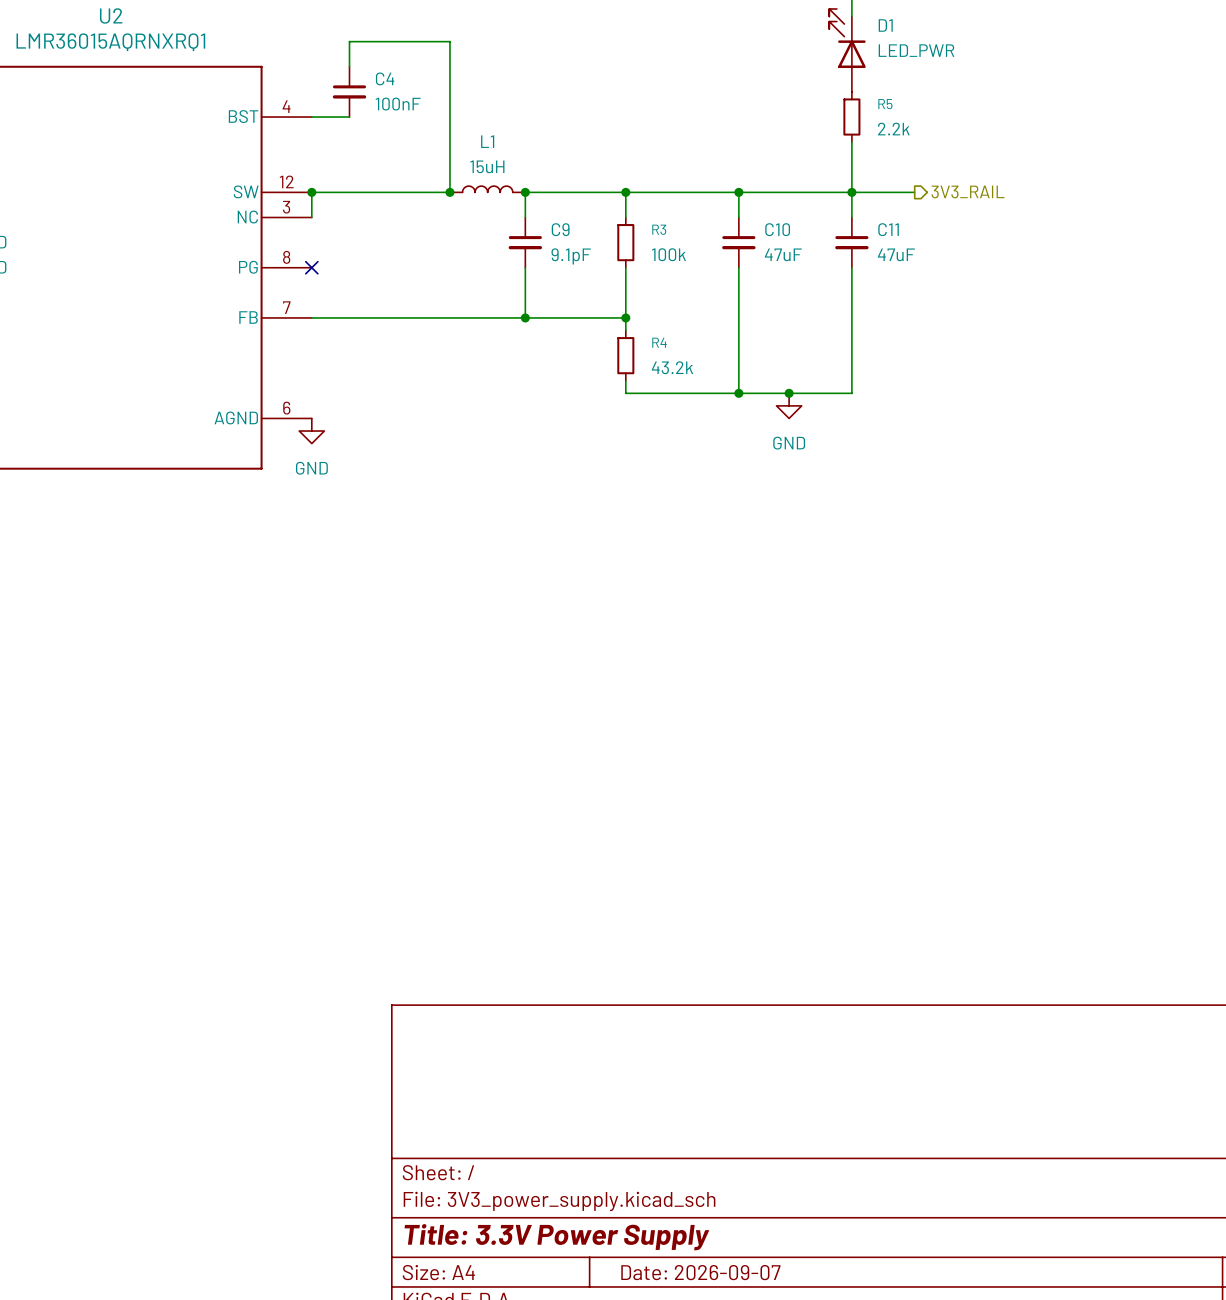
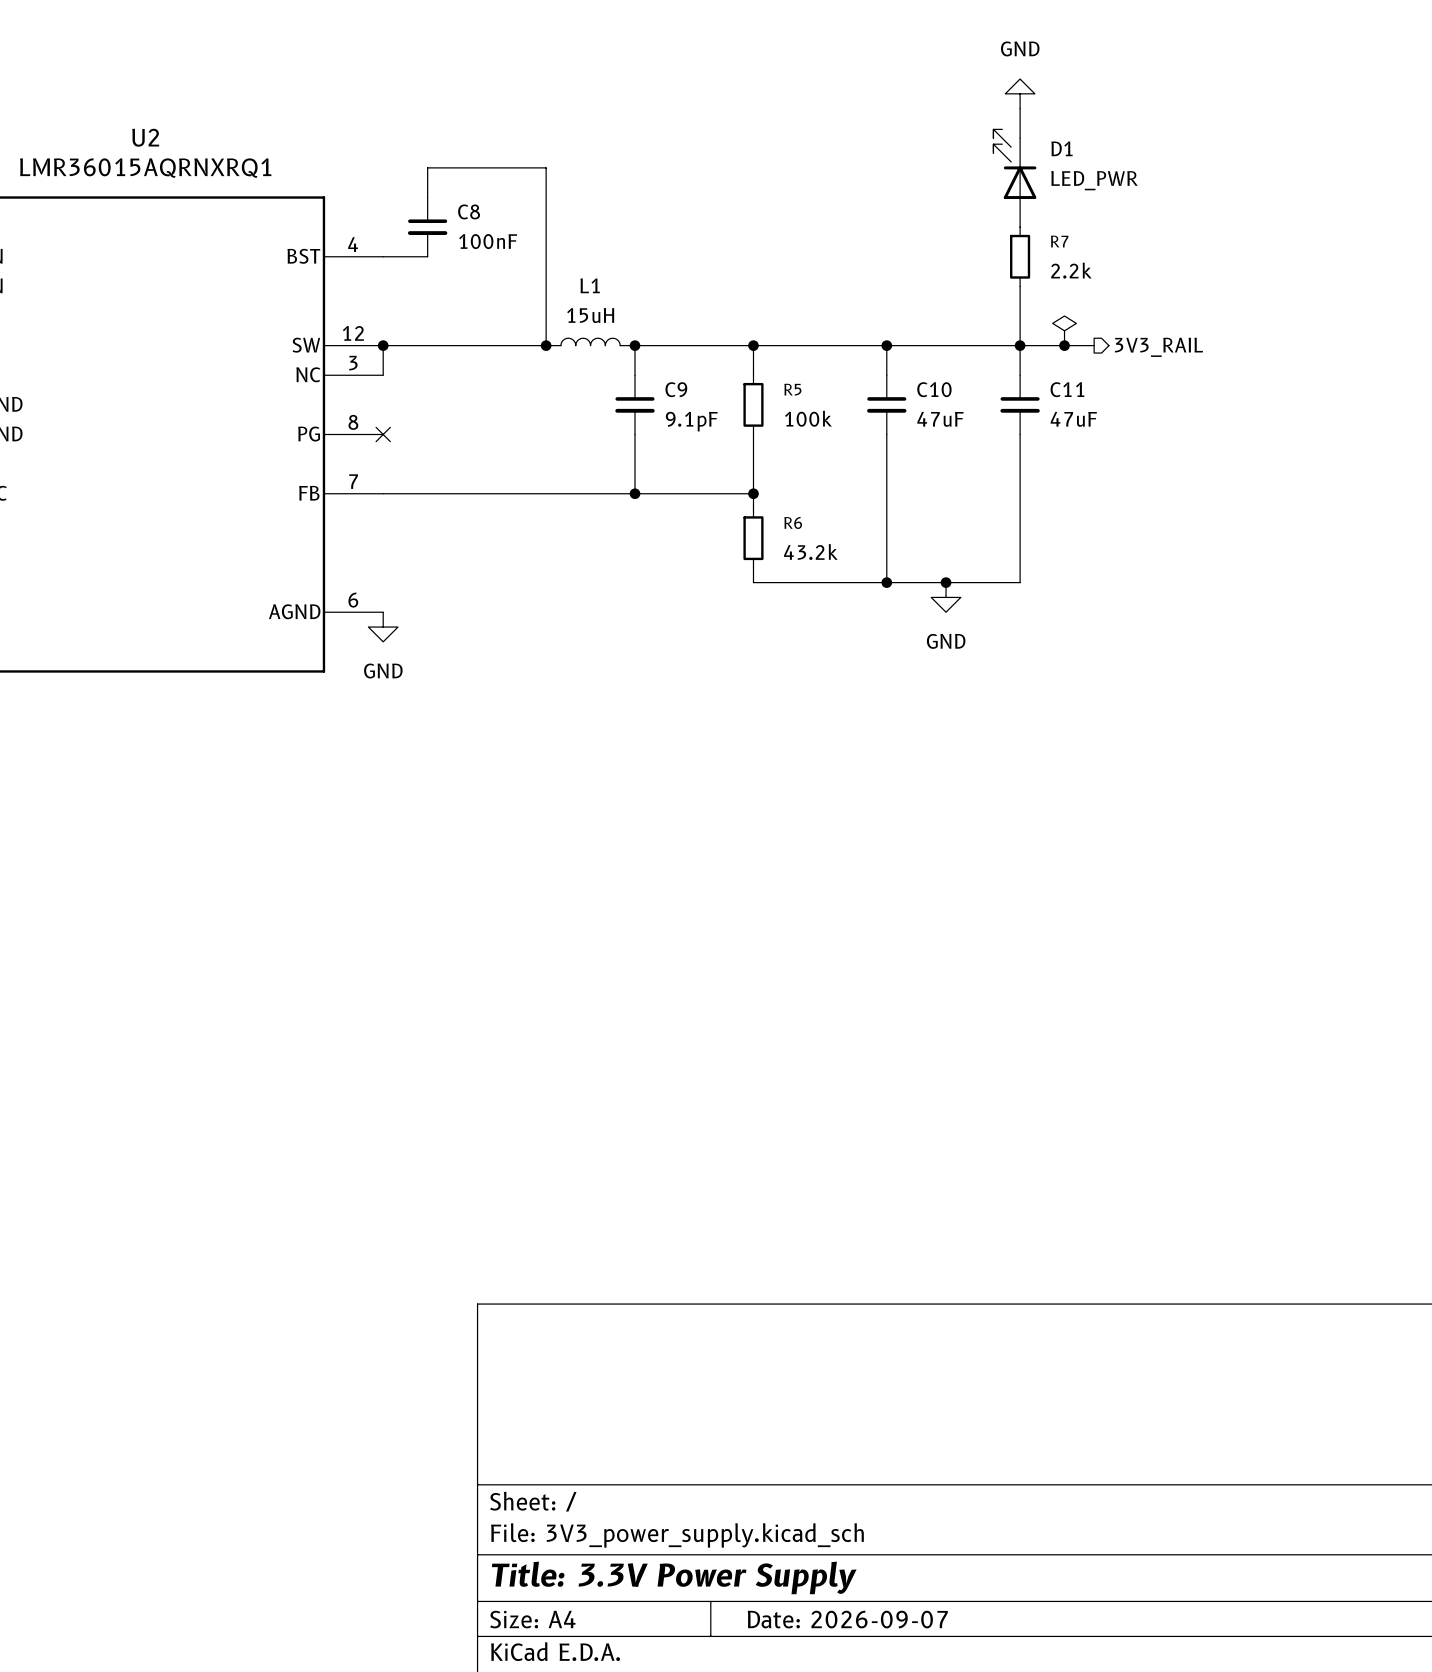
C4 name: C4 (385, 78) -> C8 (469, 211)
R5 name: R5 (885, 104) -> R7 (1059, 241)
power symbol: none -> (1064, 330)
junction: none -> (1064, 345)
R3 name: R3 (659, 229) -> R5 (792, 389)
R4 name: R4 (659, 342) -> R6 (793, 523)

